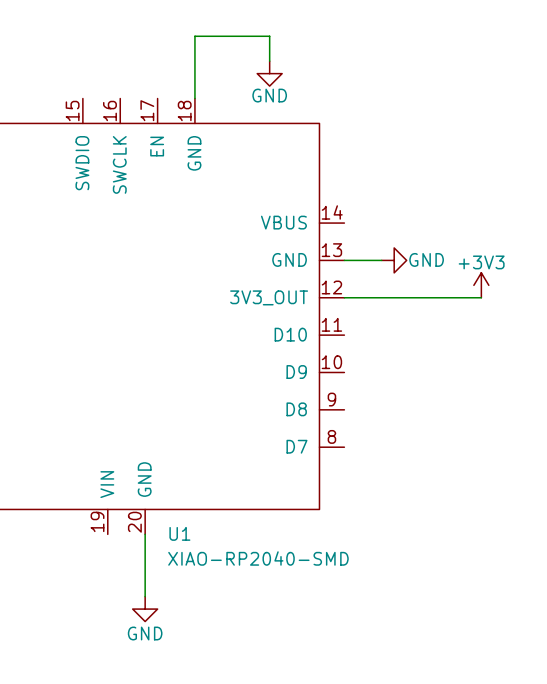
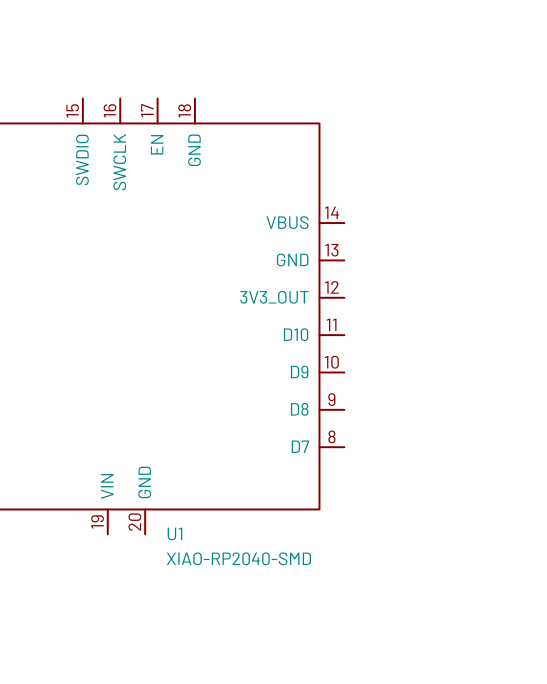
wire: (269, 61) (269, 36) (194, 36) (194, 98) -> none
power symbol: GND (269, 73) -> none
wire: (344, 260) (381, 260) -> none
power symbol: GND (394, 260) -> none
power symbol: +3V3 (481, 285) -> none
wire: (344, 297) (481, 297) -> none
wire: (145, 534) (145, 596) -> none
power symbol: GND (145, 609) -> none

